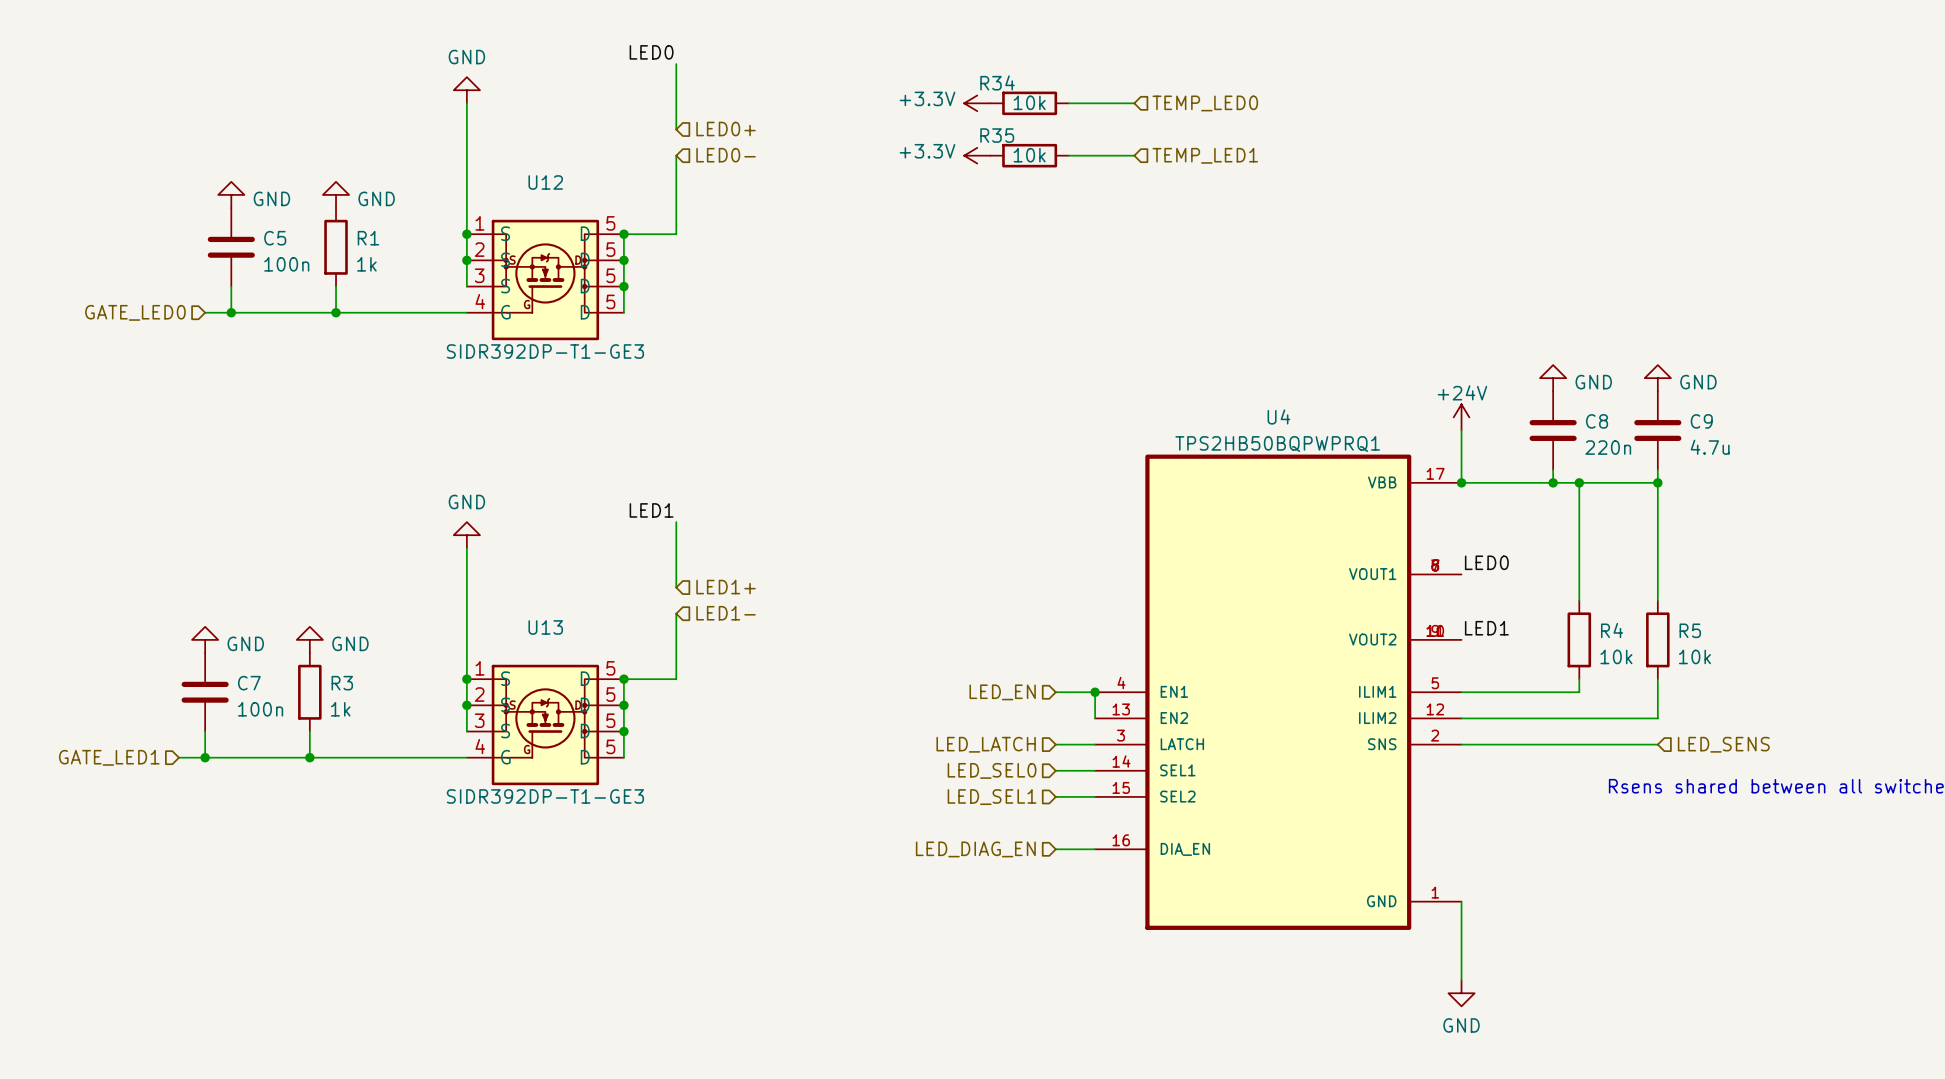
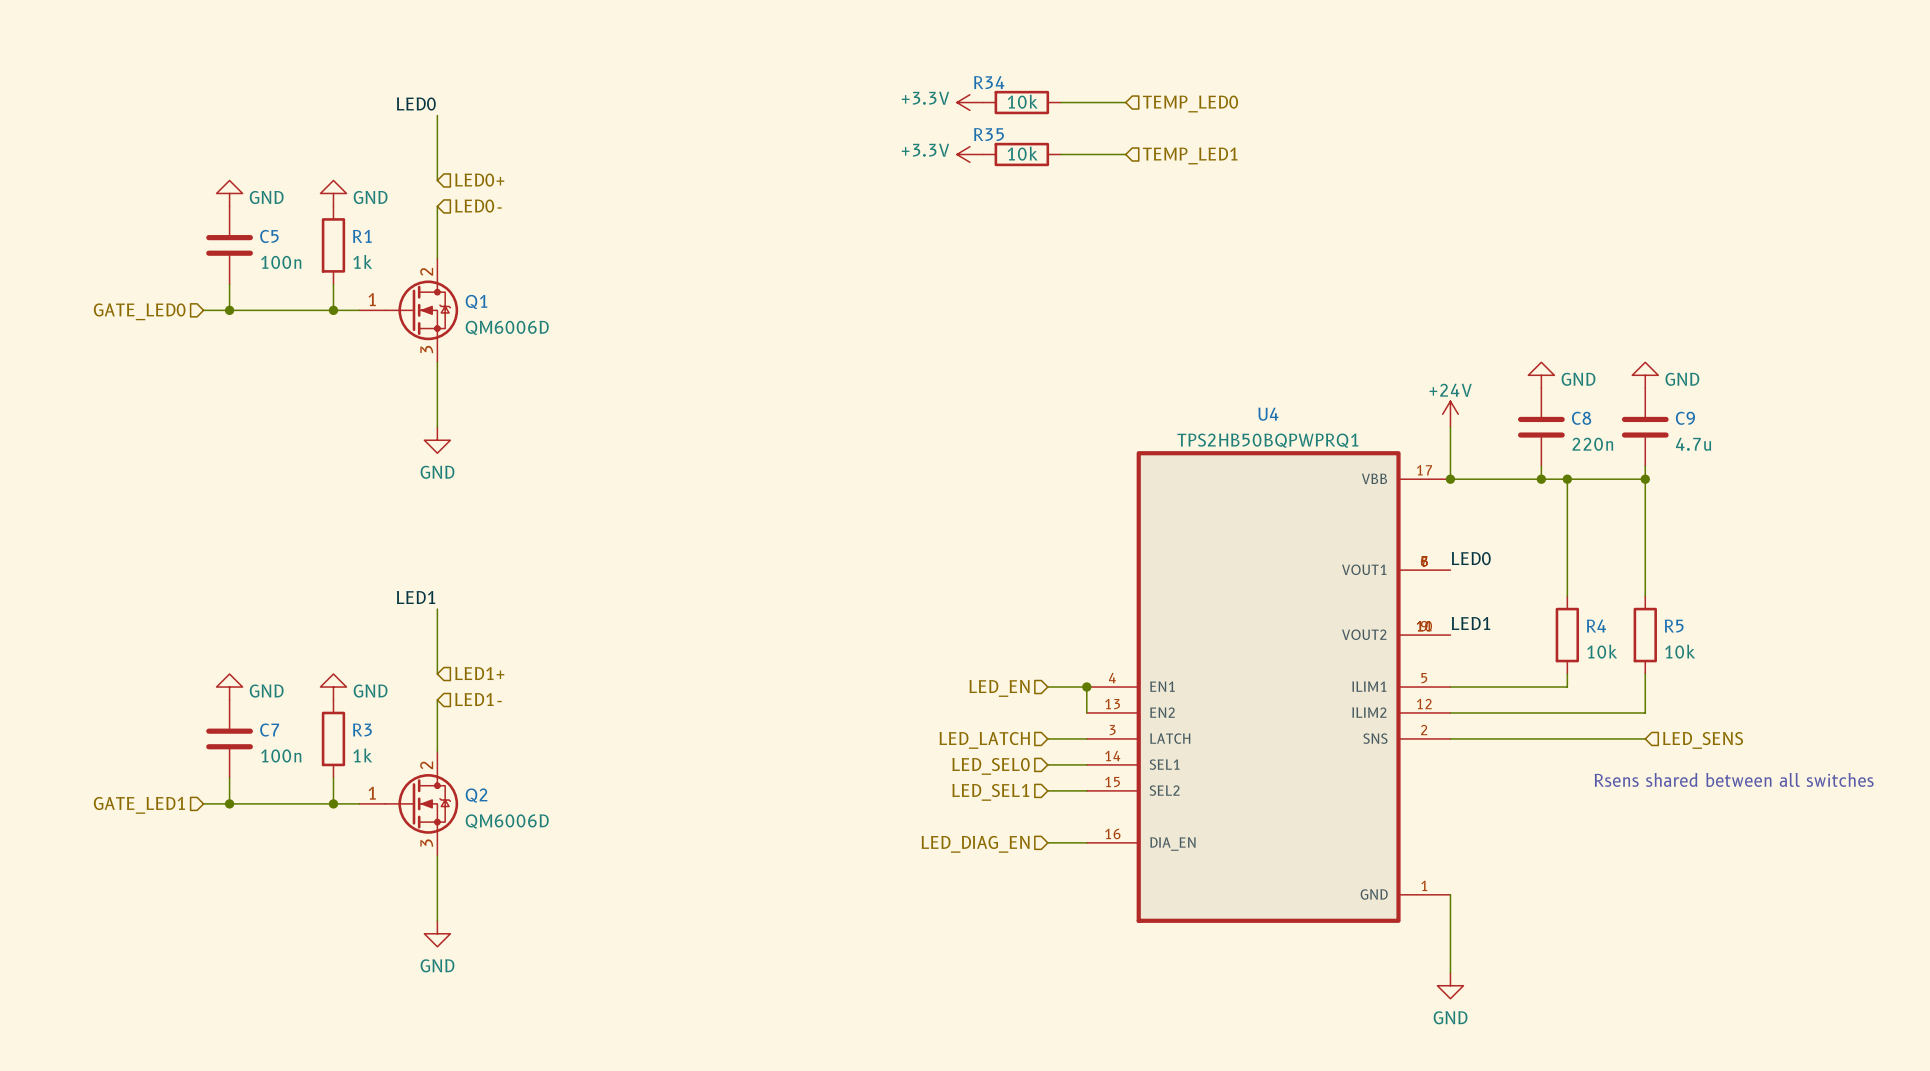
label position: LED0 (651, 52) -> LED0 (416, 104)
wire: (676, 64) (676, 129) -> (437, 115) (437, 180)
power symbol: GND (466, 90) -> none
wire: (466, 103) (466, 286) -> none
hierarchical label position: LED0+ (726, 129) -> LED0+ (479, 180)
wire: (676, 155) (676, 234) (623, 234) (623, 312) -> none
hierarchical label position: LED0- (726, 155) -> LED0- (478, 206)
wire: none -> (437, 206) (437, 258)
junction: (466, 234) -> none
junction: (623, 234) -> none
junction: (466, 260) -> none
junction: (623, 260) -> none
U12: SIDR392DP-T1-GE3 (545, 280) -> none
junction: (623, 286) -> none
Q1: none -> QM6006D (408, 310)
wire: none -> (437, 362) (437, 427)
label position: LED1 (651, 510) -> LED1 (416, 597)
wire: (676, 522) (676, 587) -> (437, 609) (437, 674)
power symbol rotation: 0° (466, 535) -> 180° (437, 440)
power symbol position: GND (466, 535) -> GND (437, 440)
wire: (466, 548) (466, 731) -> none
hierarchical label position: LED1+ (726, 587) -> LED1+ (479, 673)
wire: (676, 613) (676, 679) (623, 679) (623, 757) -> none
hierarchical label position: LED1- (726, 613) -> LED1- (478, 699)
power symbol: GND (205, 639) -> none
power symbol: GND (309, 639) -> none
junction: (466, 679) -> none
junction: (623, 679) -> none
C7 position: (205, 692) -> (229, 738)
power symbol: none -> GND (229, 687)
R3 position: (309, 692) -> (333, 738)
power symbol: none -> GND (333, 687)
wire: none -> (437, 700) (437, 751)
junction: (466, 705) -> none
junction: (623, 705) -> none
U13: SIDR392DP-T1-GE3 (545, 724) -> none
wire: (205, 731) (205, 757) -> (229, 777) (229, 803)
wire: (309, 731) (309, 757) -> (333, 777) (333, 803)
junction: (623, 731) -> none
hierarchical label position: GATE_LED1 (109, 757) -> GATE_LED1 (139, 805)
wire: (178, 757) (466, 757) -> none
junction: (205, 757) -> none
junction: (309, 757) -> none
wire: none -> (203, 803) (359, 803)
junction: none -> (229, 803)
junction: none -> (333, 803)
Q2: none -> QM6006D (408, 803)
wire: none -> (437, 855) (437, 920)
power symbol: none -> GND (437, 933)

